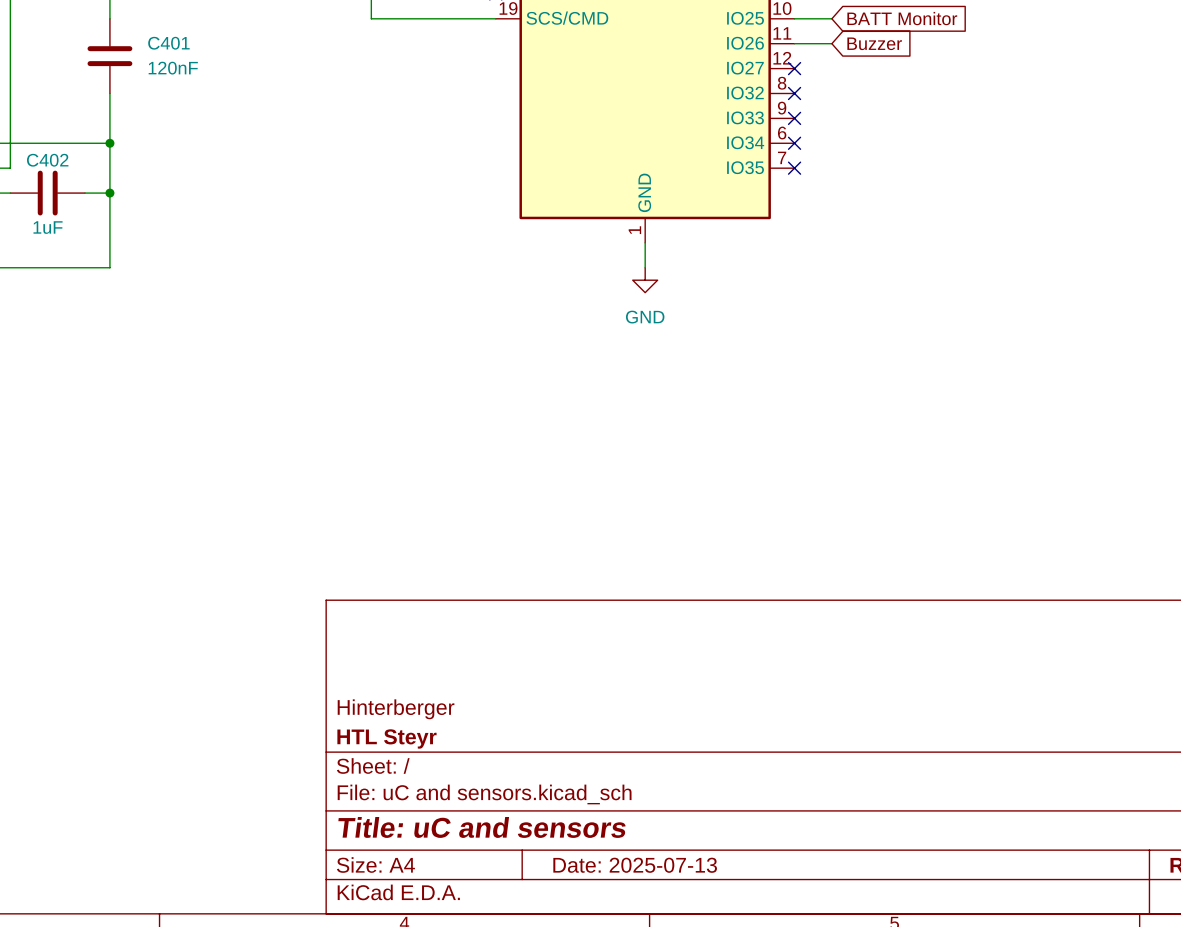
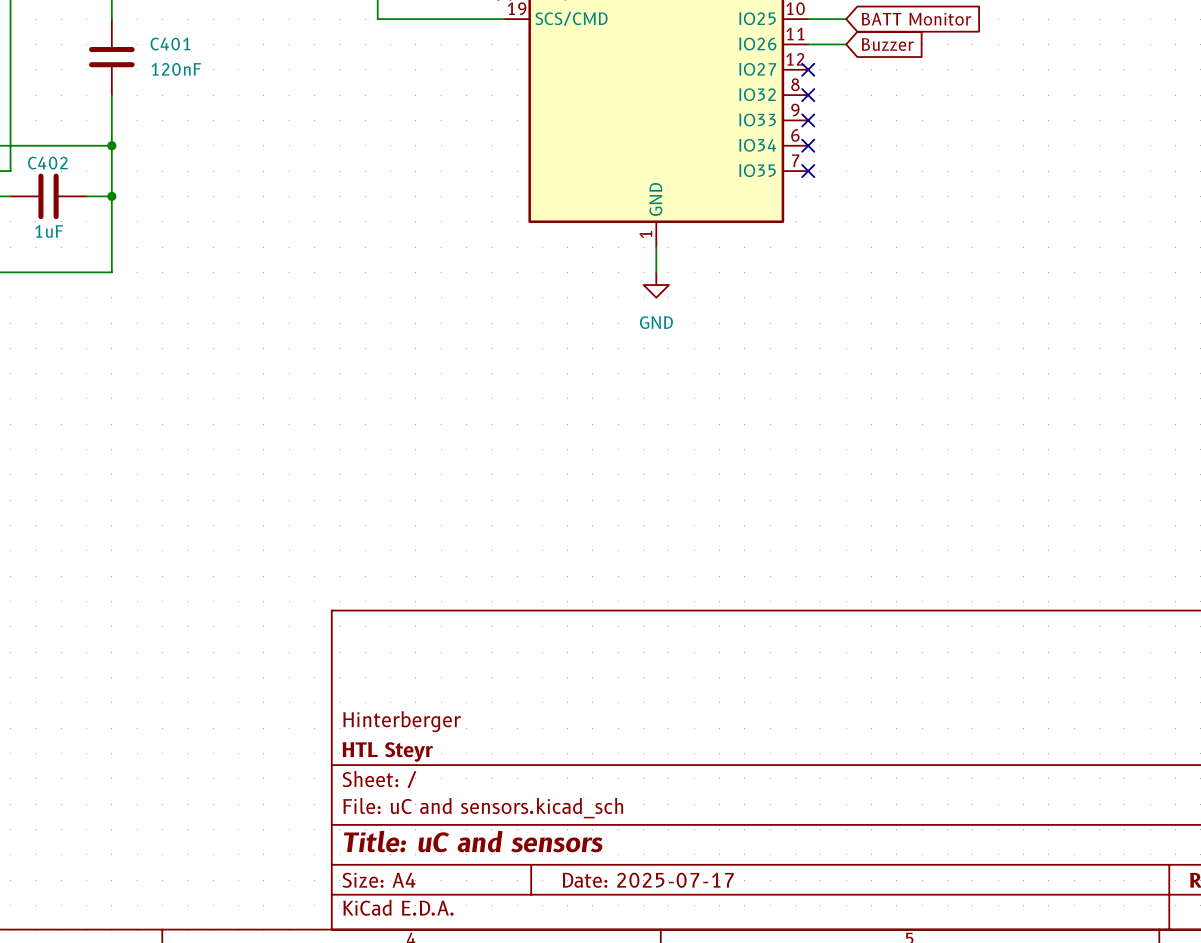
title block: Date: 2025-07-13 (635, 865) -> Date: 2025-07-17 (648, 880)

